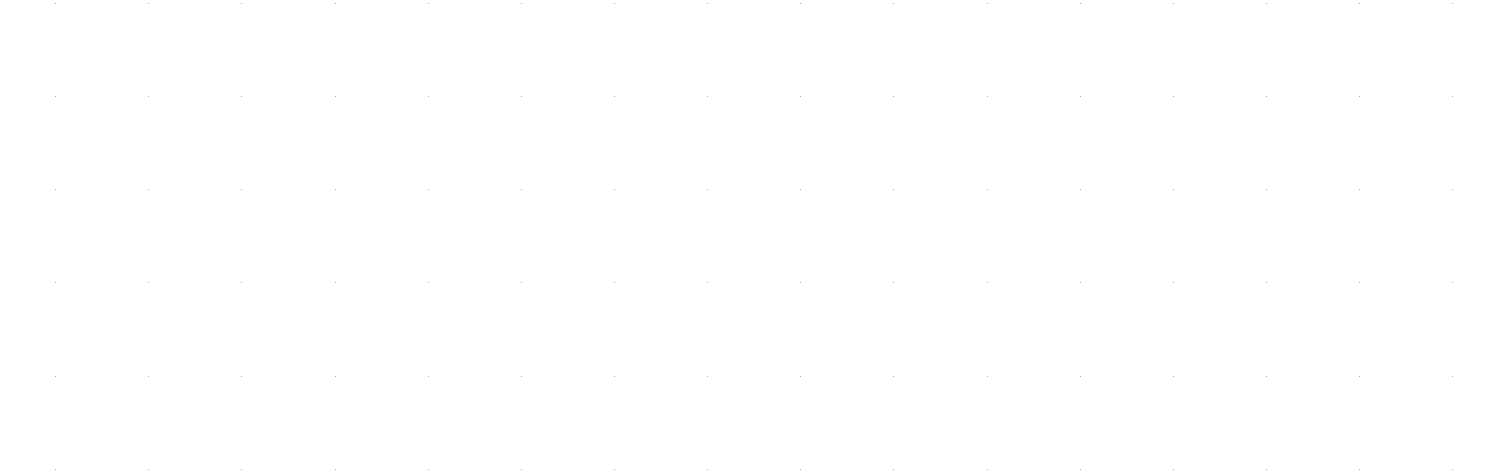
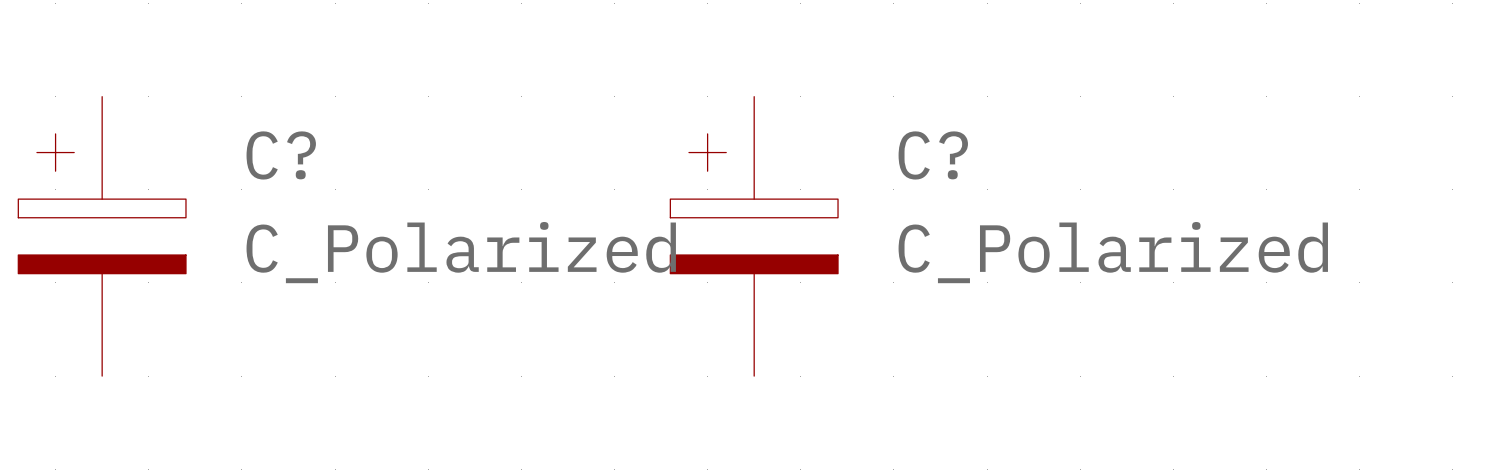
C?: none -> C_Polarized (102, 236)
C?: none -> C_Polarized (754, 236)

